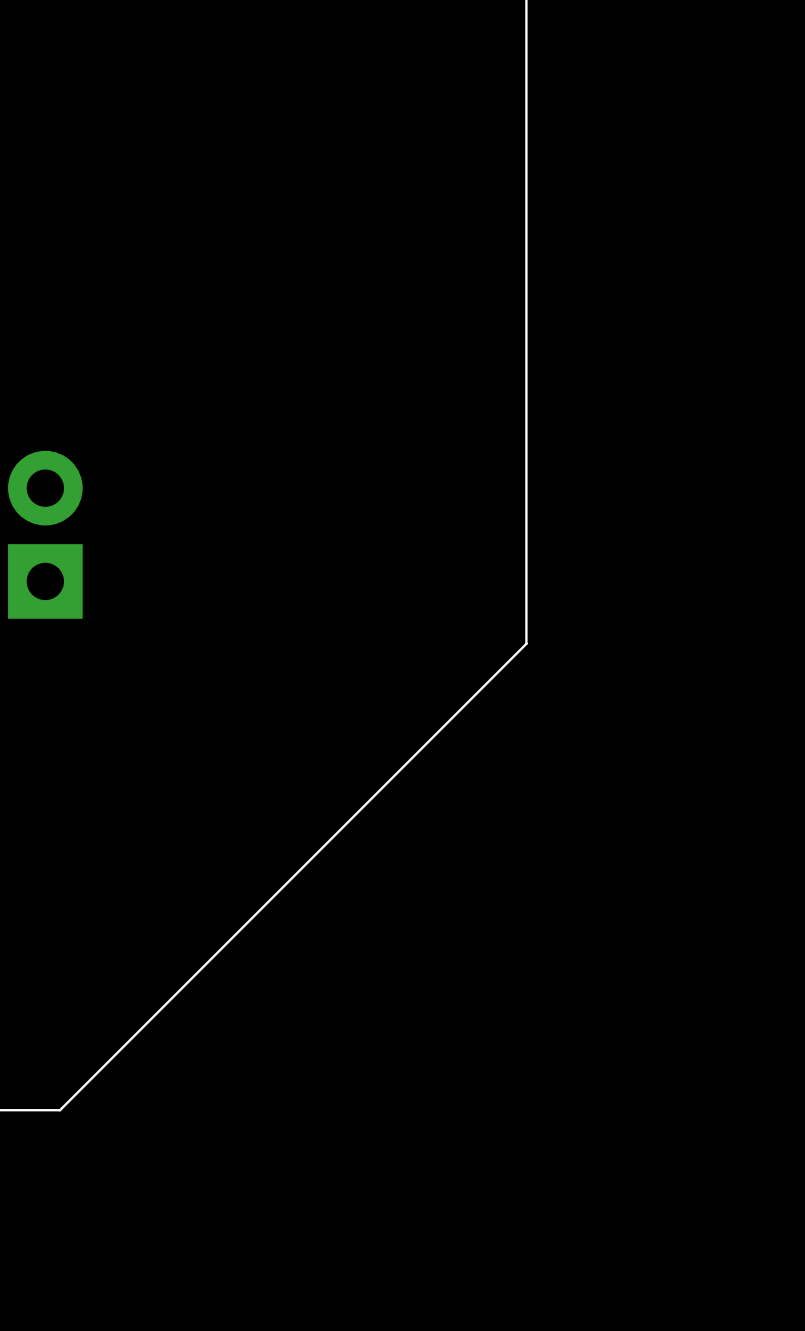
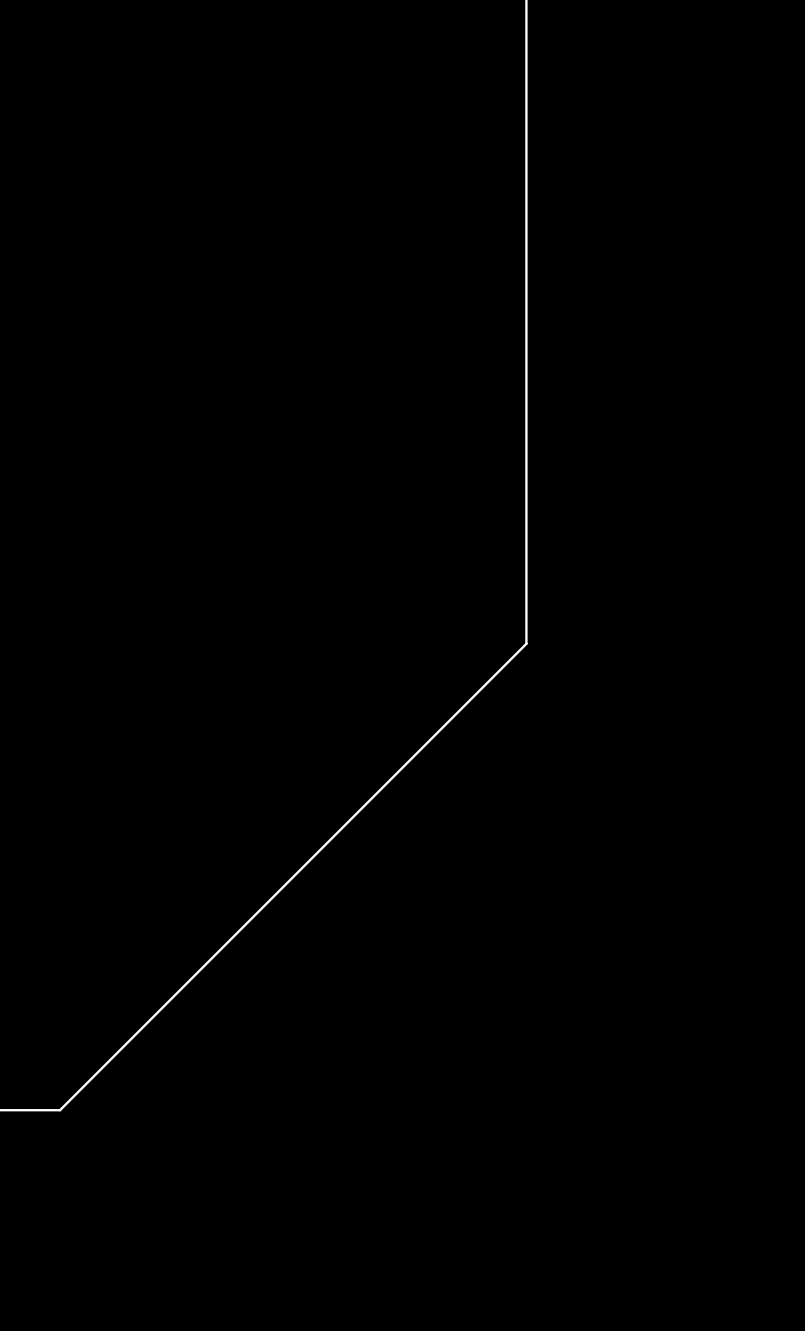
part: (45, 534) -> none

